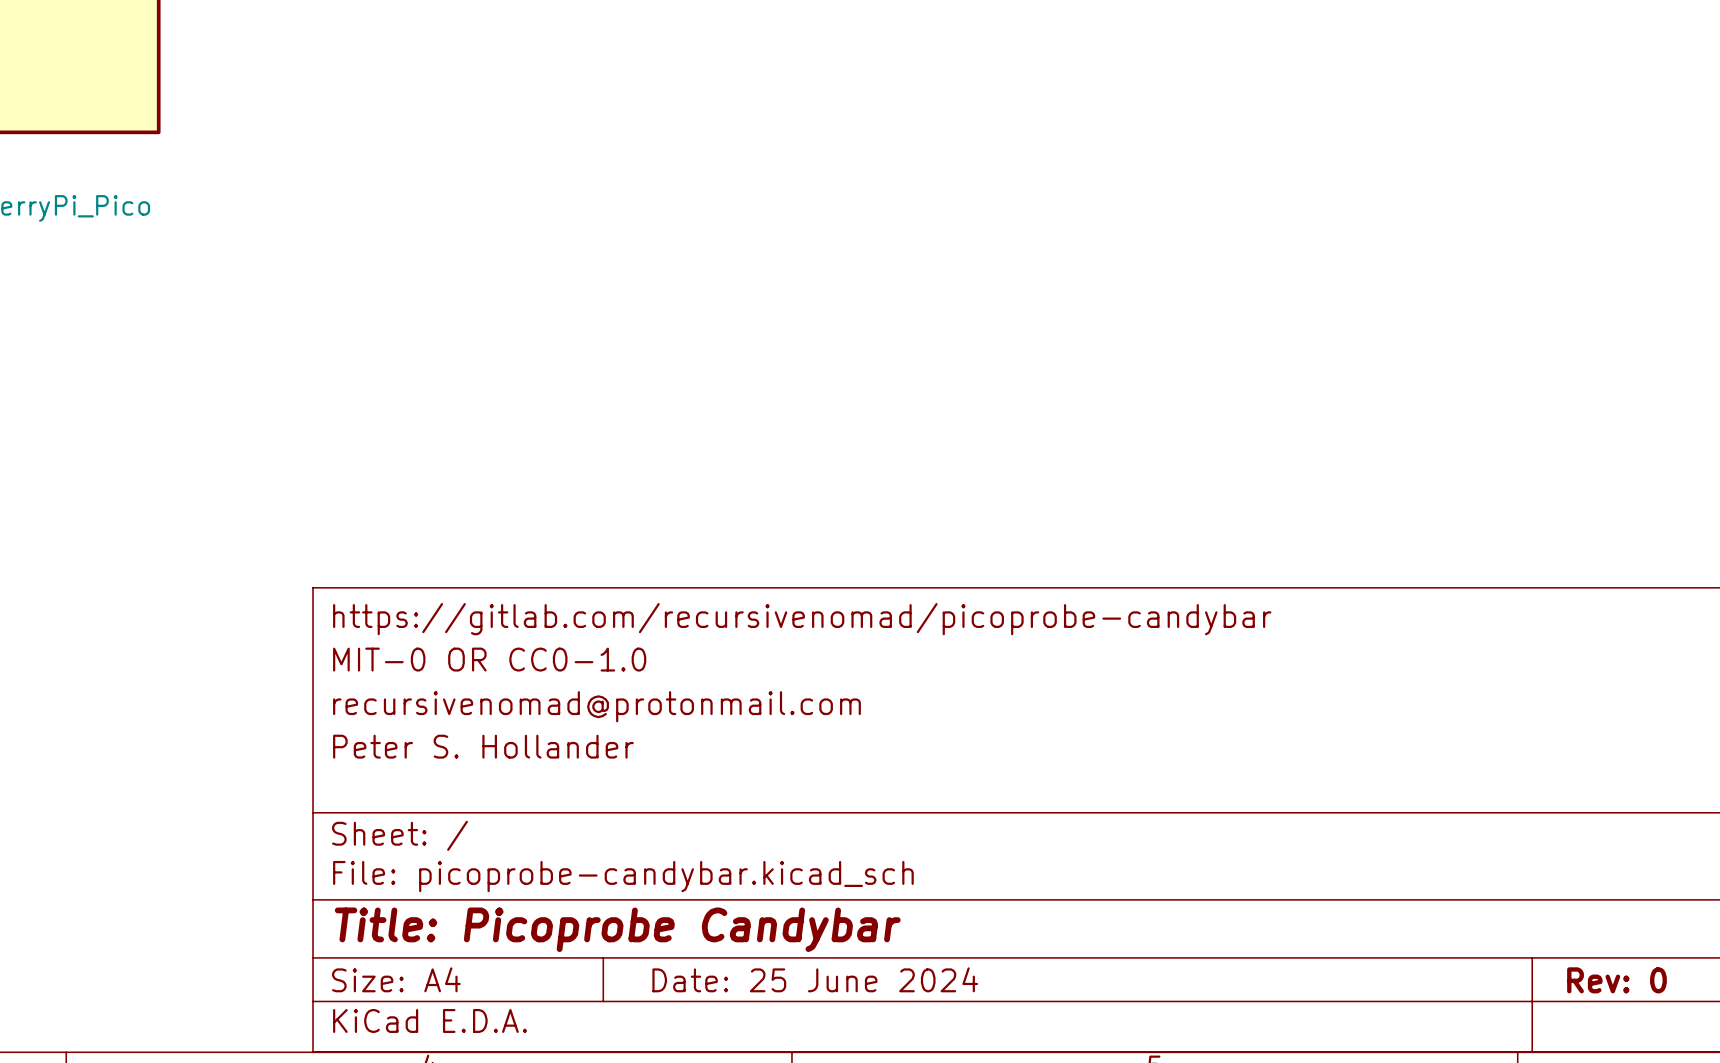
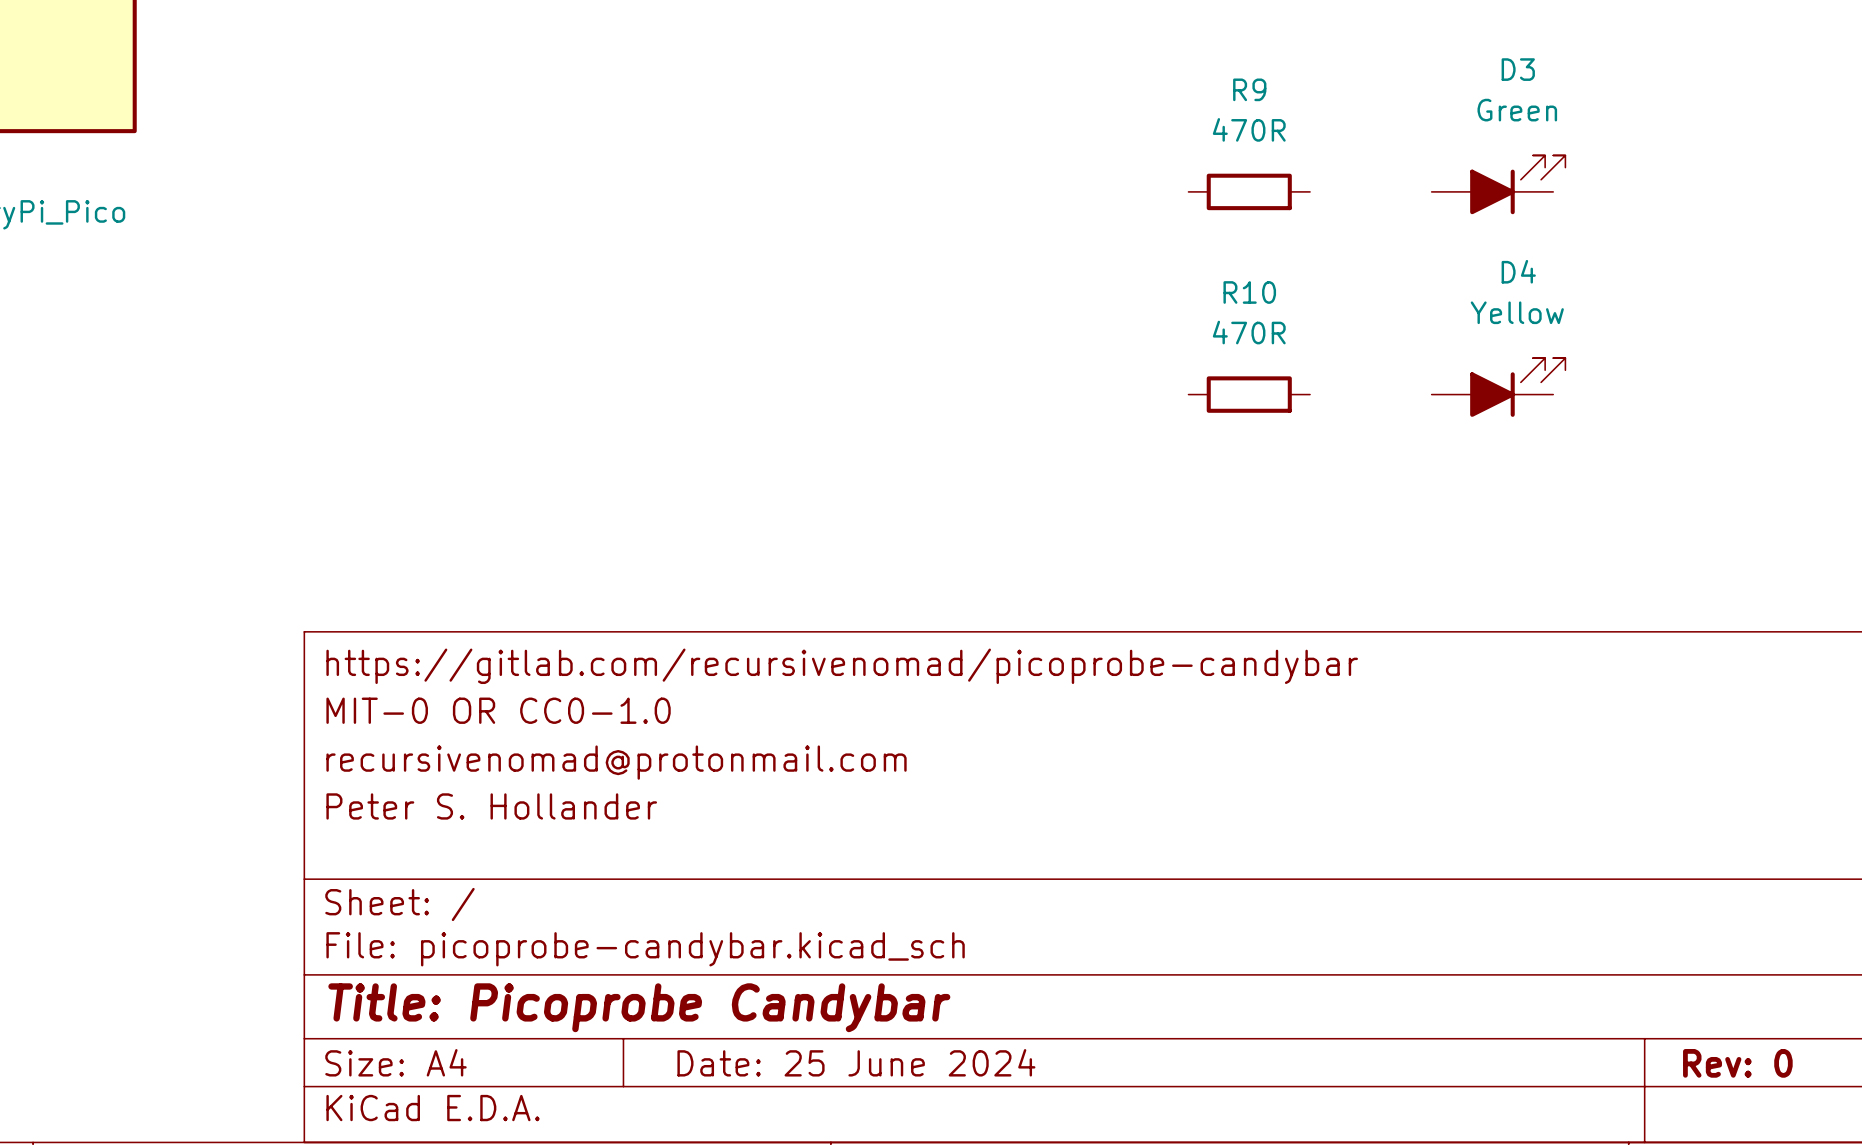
D3: none -> Green (1498, 184)
R9: none -> 470R (1249, 191)
D4: none -> Yellow (1498, 387)
R10: none -> 470R (1249, 394)

